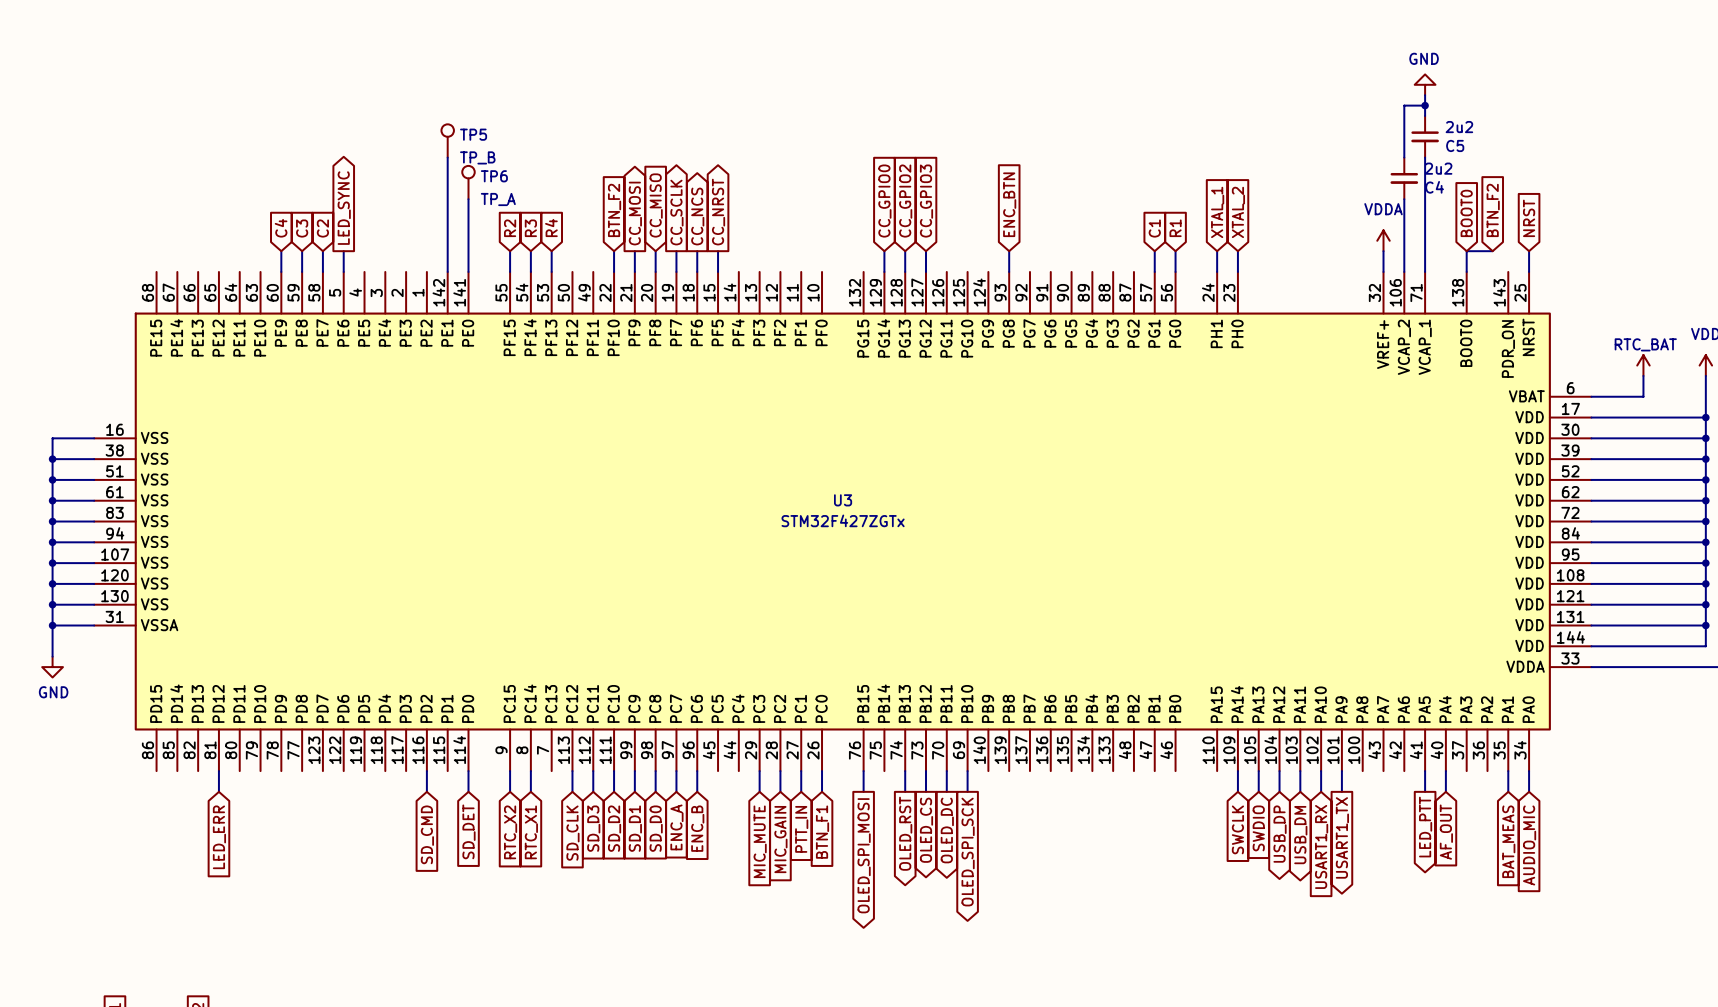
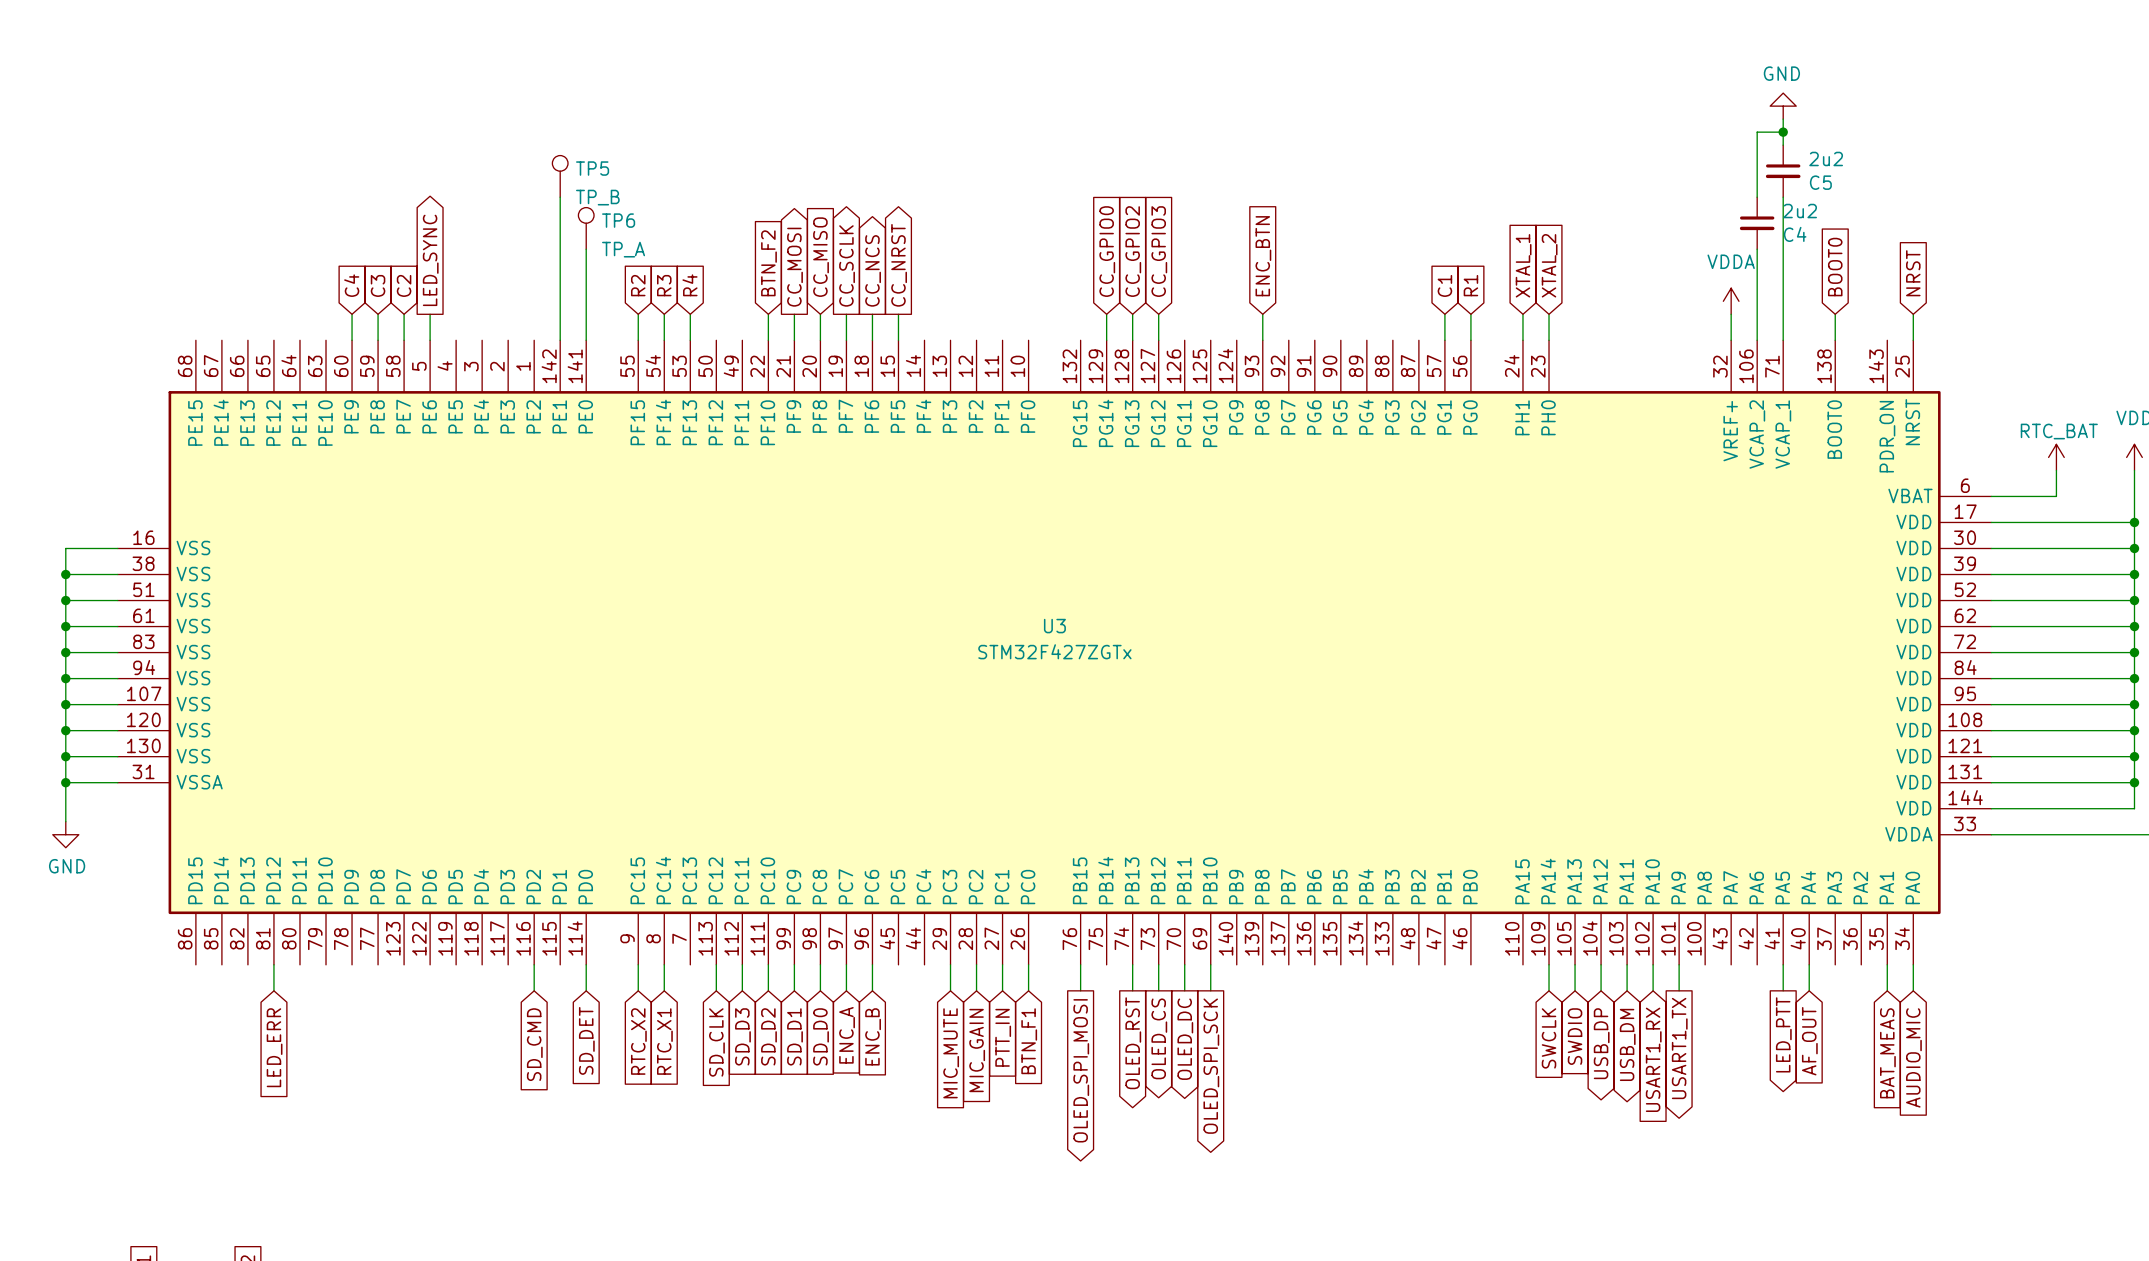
global label: BTN_F2 (1493, 210) -> none
wire: (1466, 251) (1492, 251) -> none

